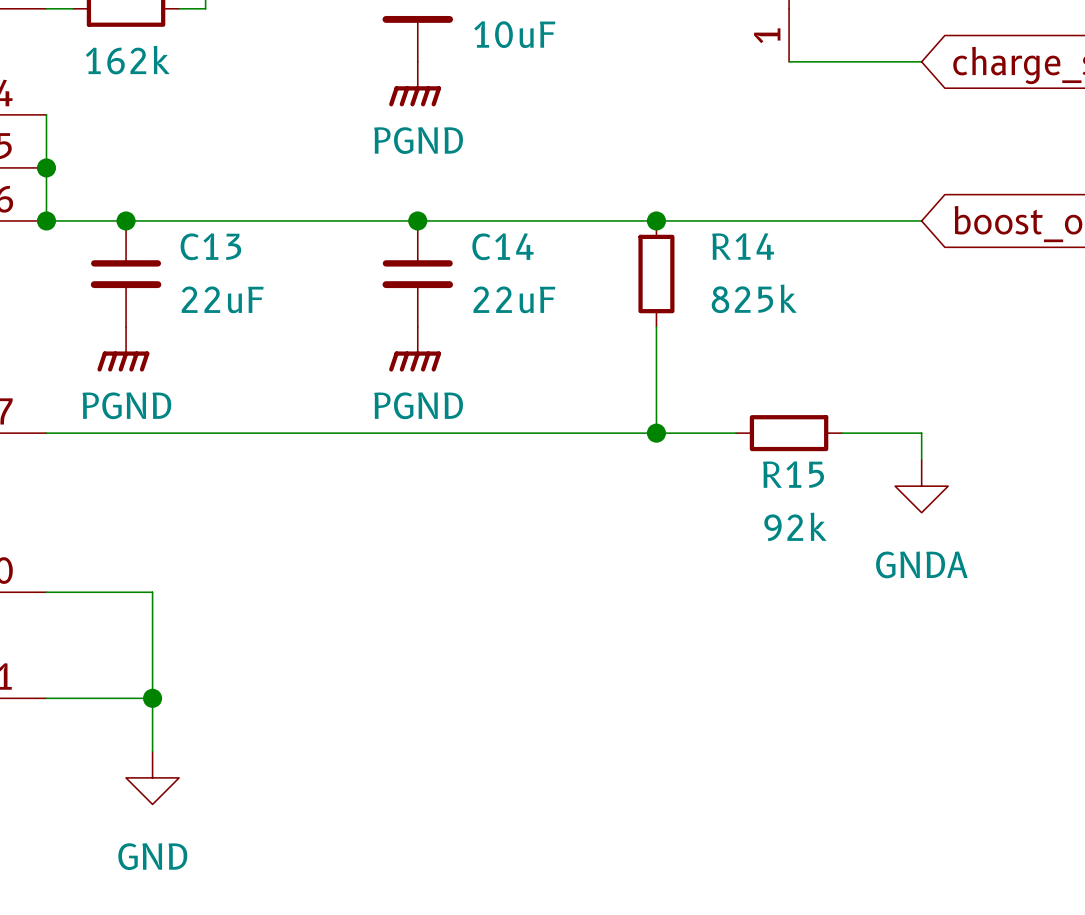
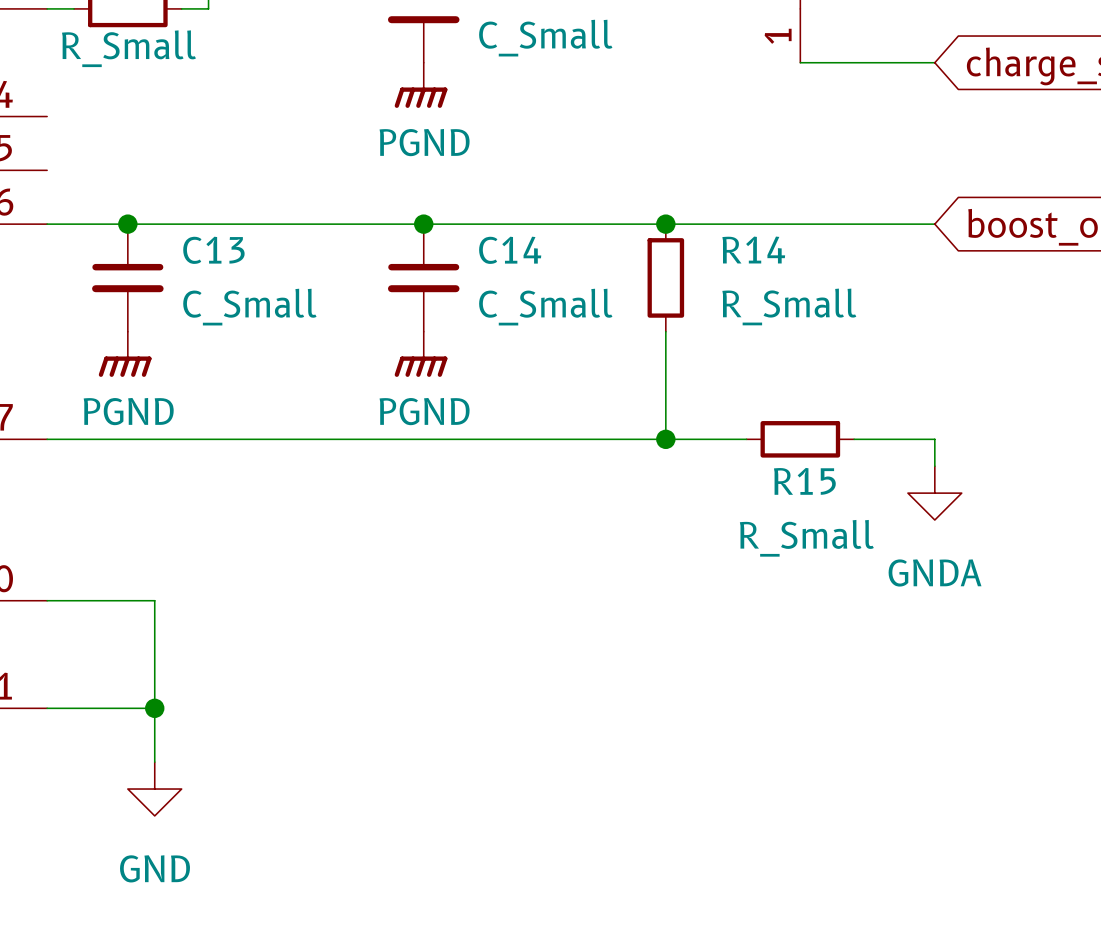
part value: 10uF (514, 34) -> C_Small (545, 38)
part value: 162k (127, 60) -> R_Small (128, 48)
wire: (46, 114) (46, 220) -> none
junction: (46, 167) -> none
junction: (46, 220) -> none
R14 value: 825k (754, 298) -> R_Small (789, 306)
C13 value: 22uF (222, 299) -> C_Small (249, 307)
C14 value: 22uF (514, 299) -> C_Small (545, 307)
R15 value: 92k (795, 526) -> R_Small (806, 538)

